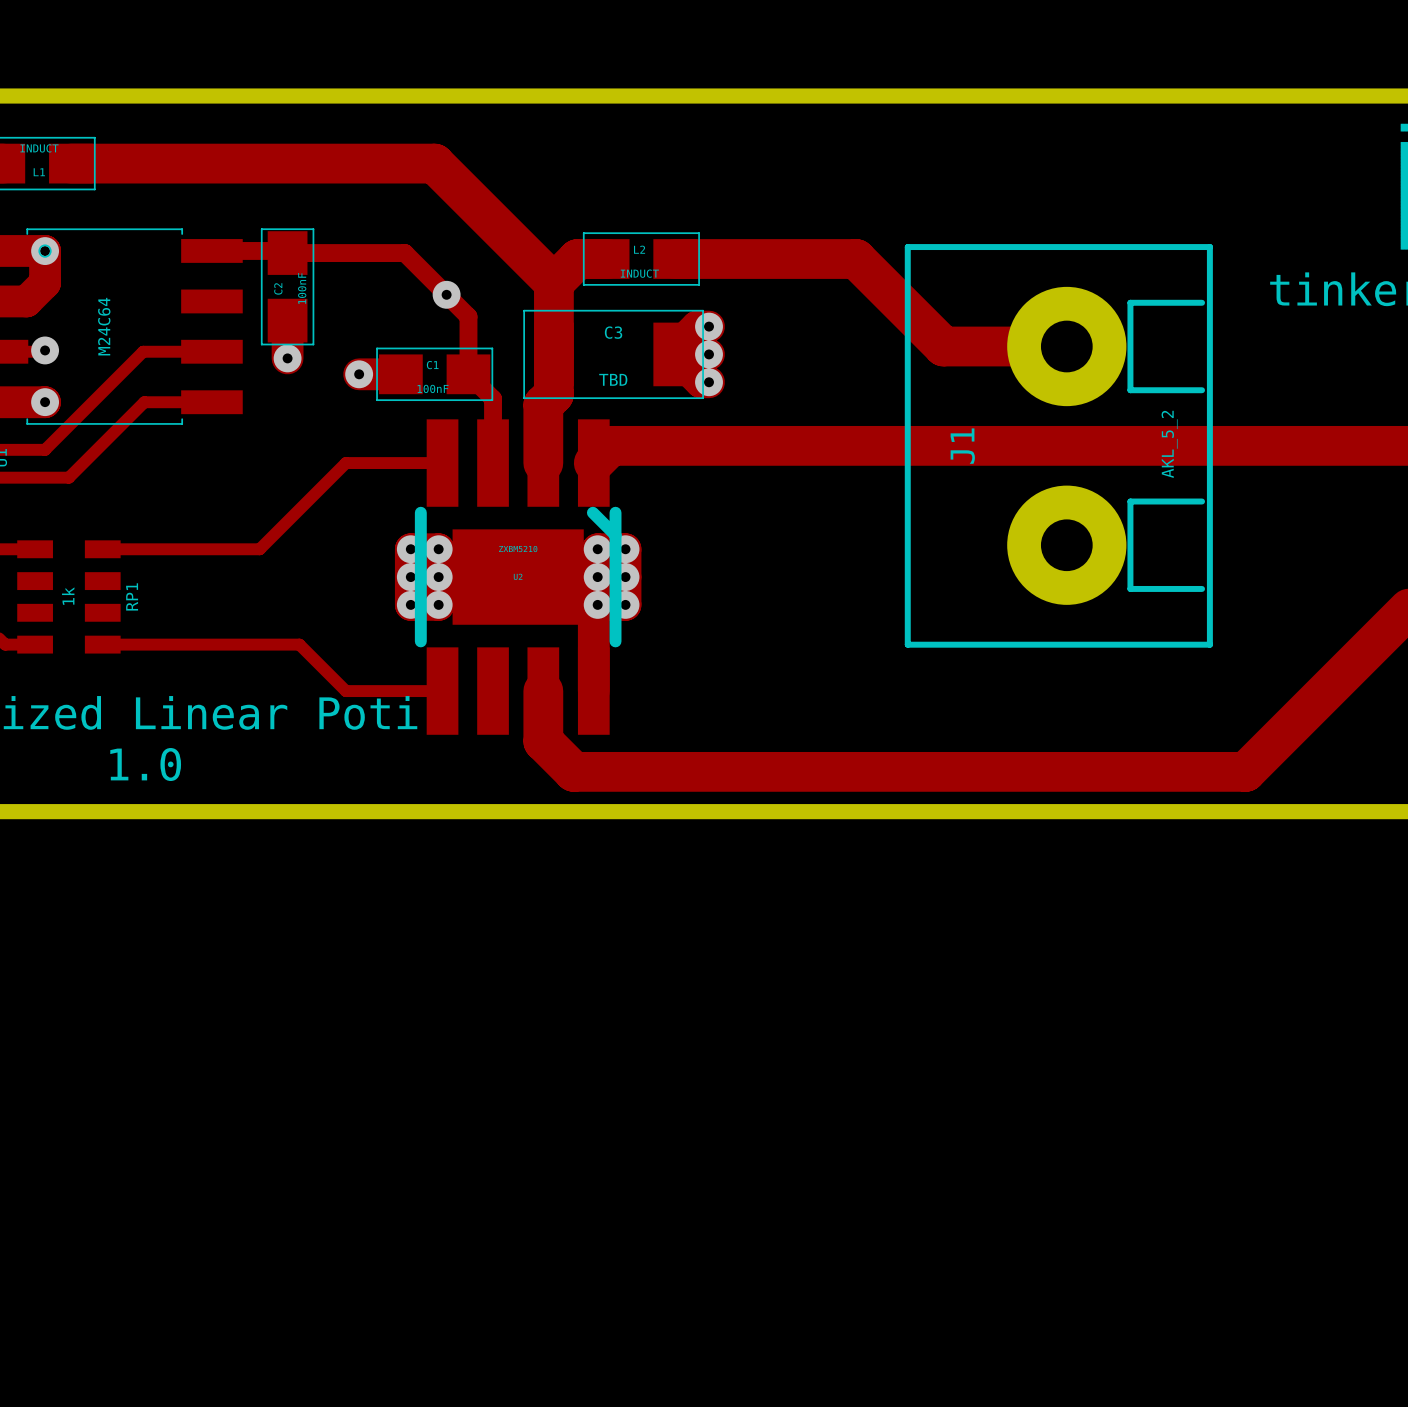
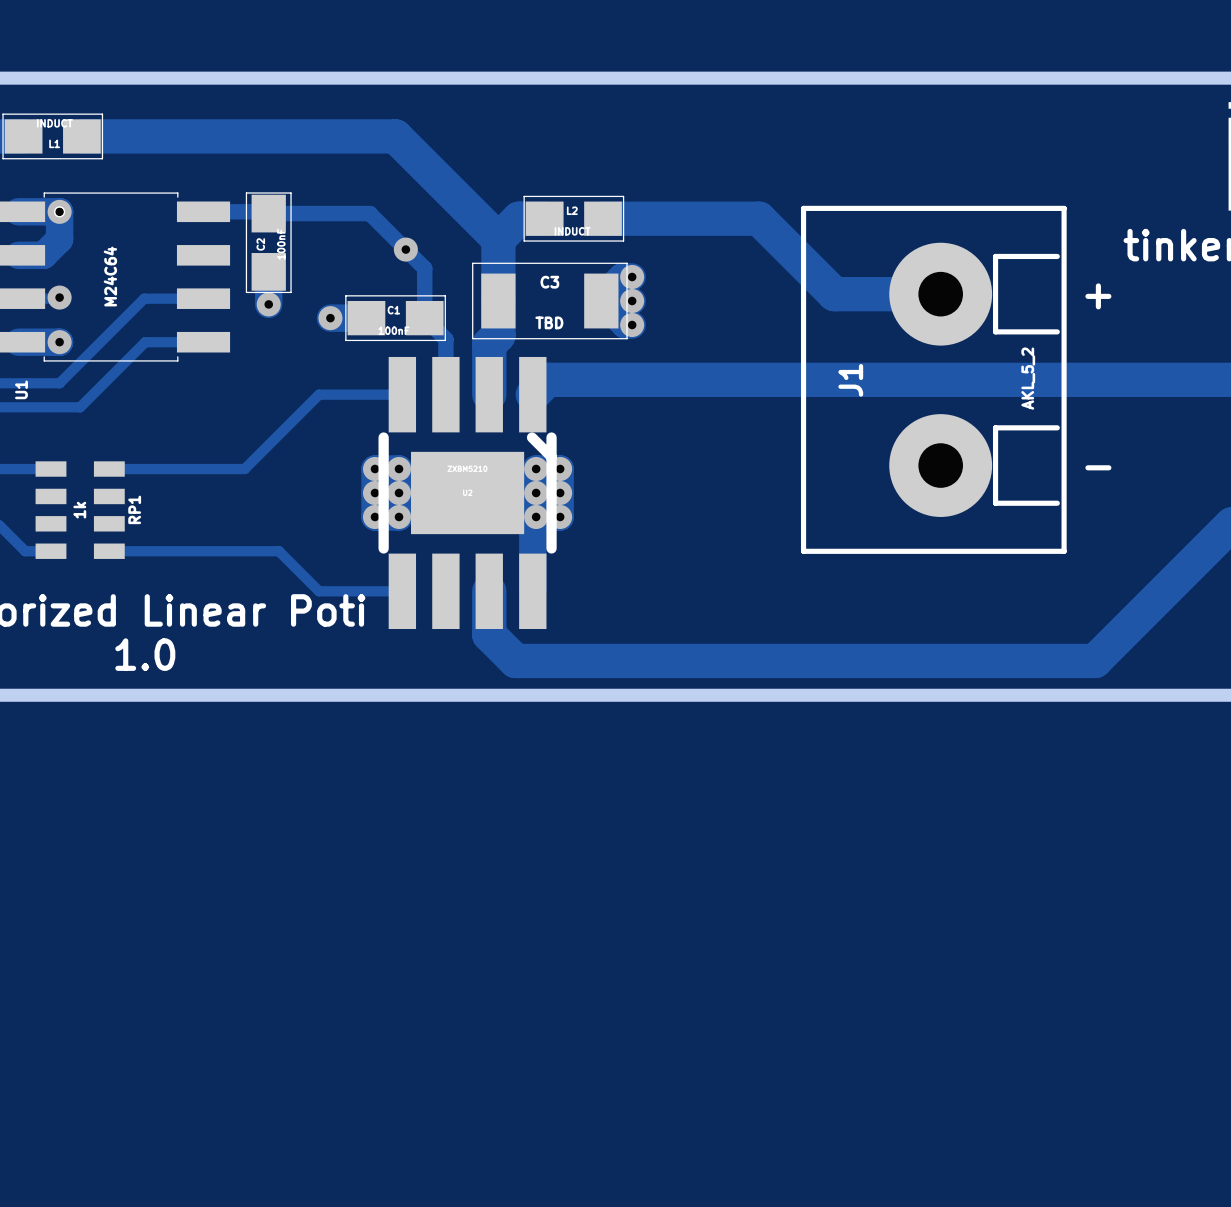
text: none -> + (1098, 296)
text: none -> - (1098, 467)

